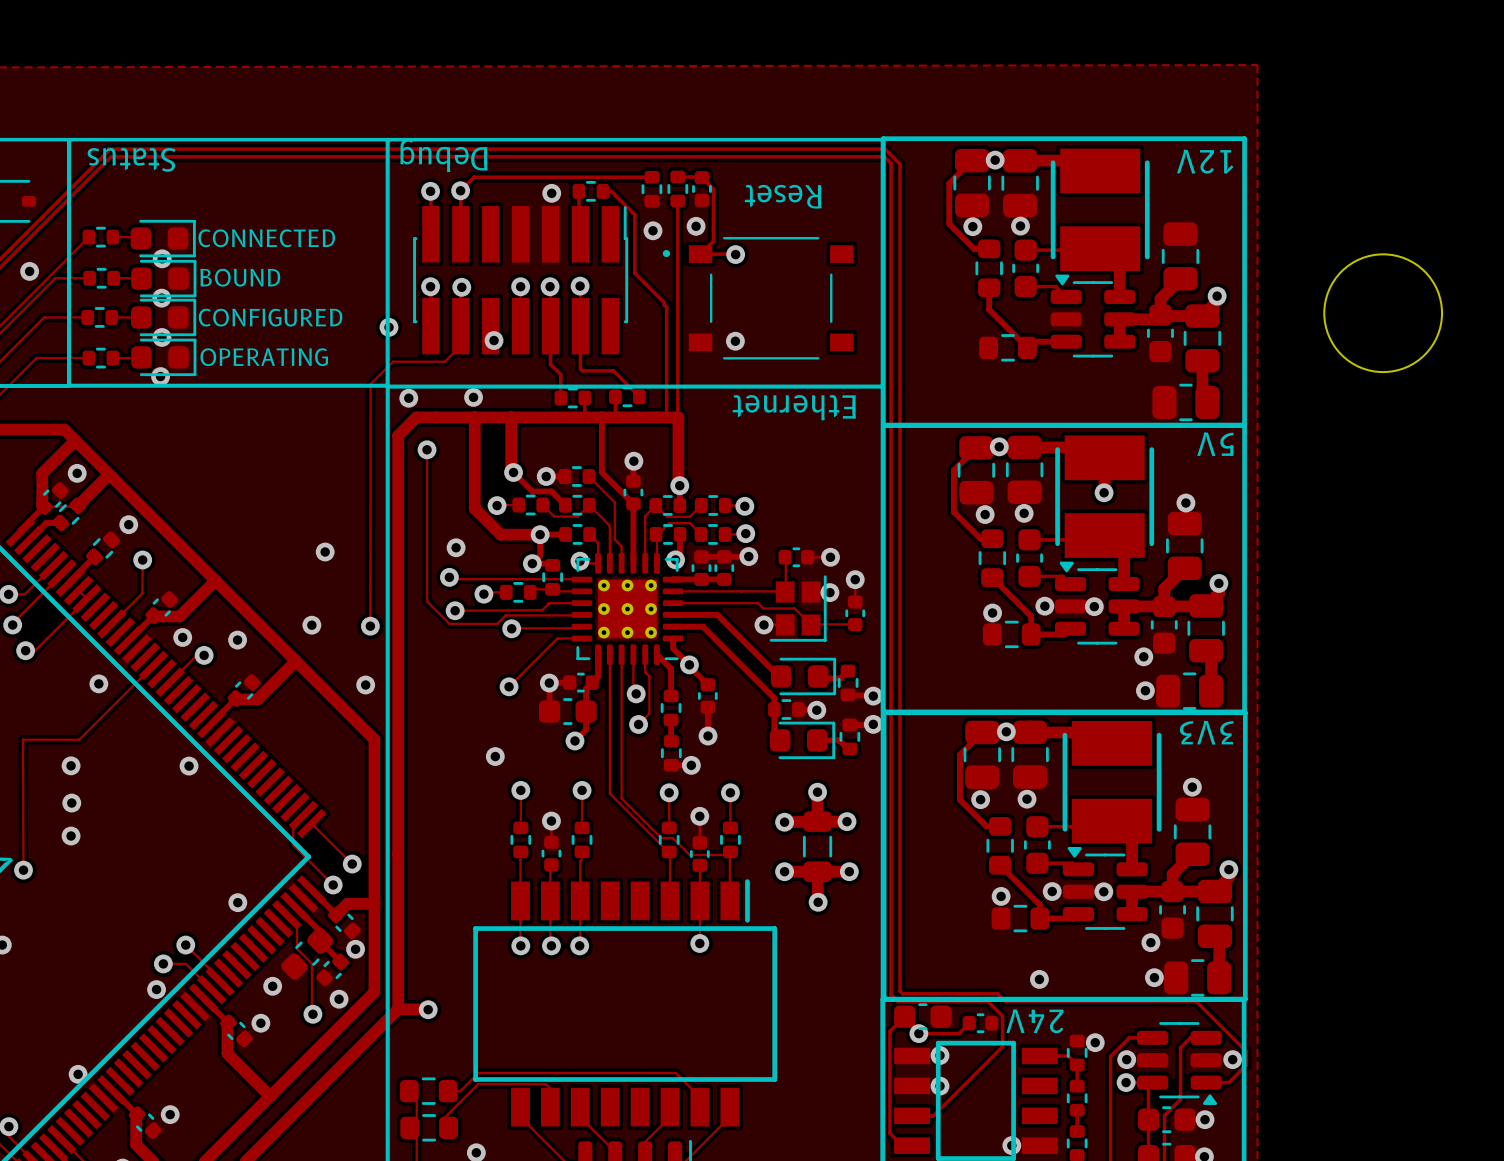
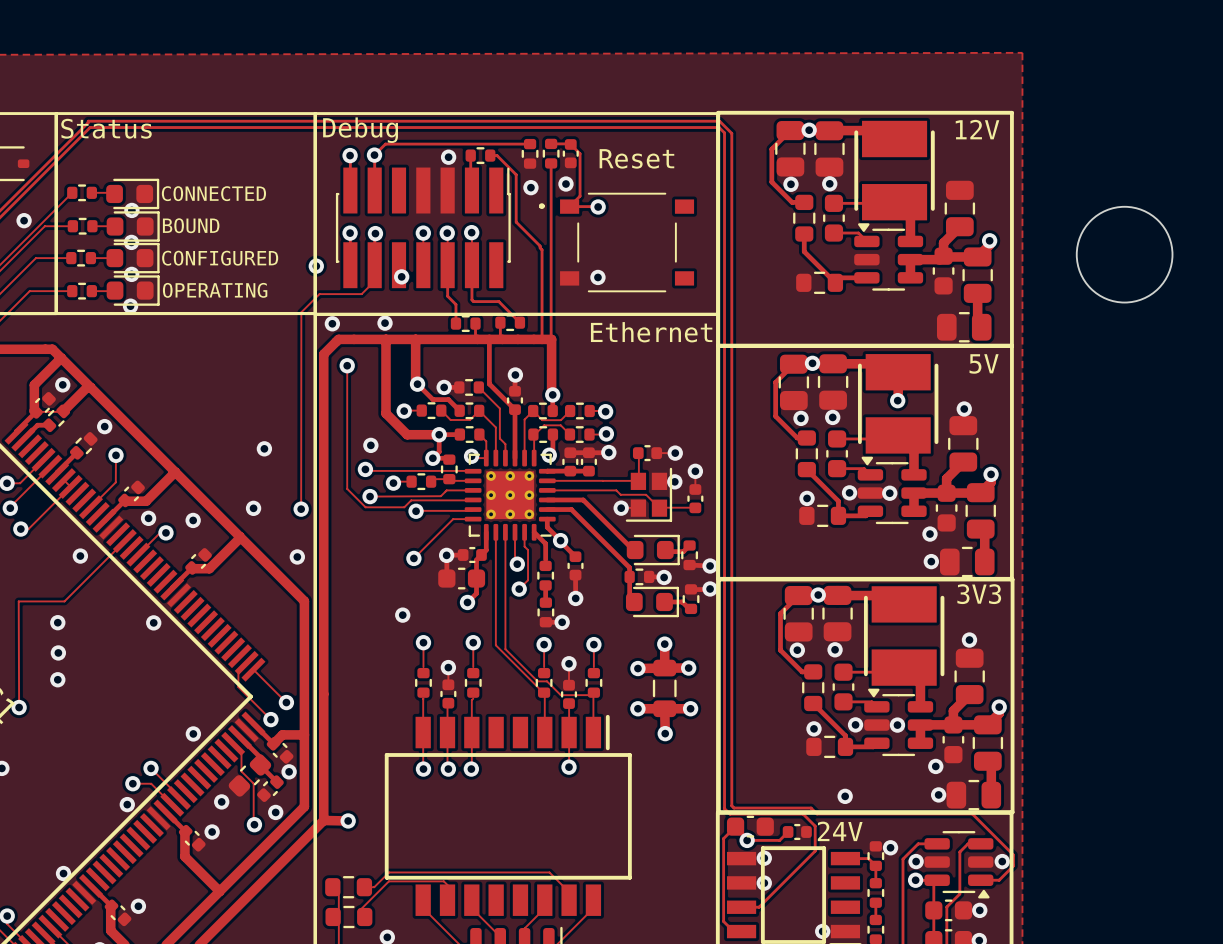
text rotation: 0° (444, 155) -> 180° (360, 130)
text rotation: 0° (131, 159) -> 180° (106, 128)
text rotation: 0° (1205, 161) -> 180° (977, 129)
text rotation: 0° (783, 196) -> 180° (636, 158)
text rotation: 0° (794, 407) -> 180° (651, 332)
text rotation: 0° (1215, 444) -> 180° (984, 363)
text rotation: 0° (1206, 732) -> 180° (979, 594)
text rotation: 0° (1034, 1021) -> 180° (840, 831)

